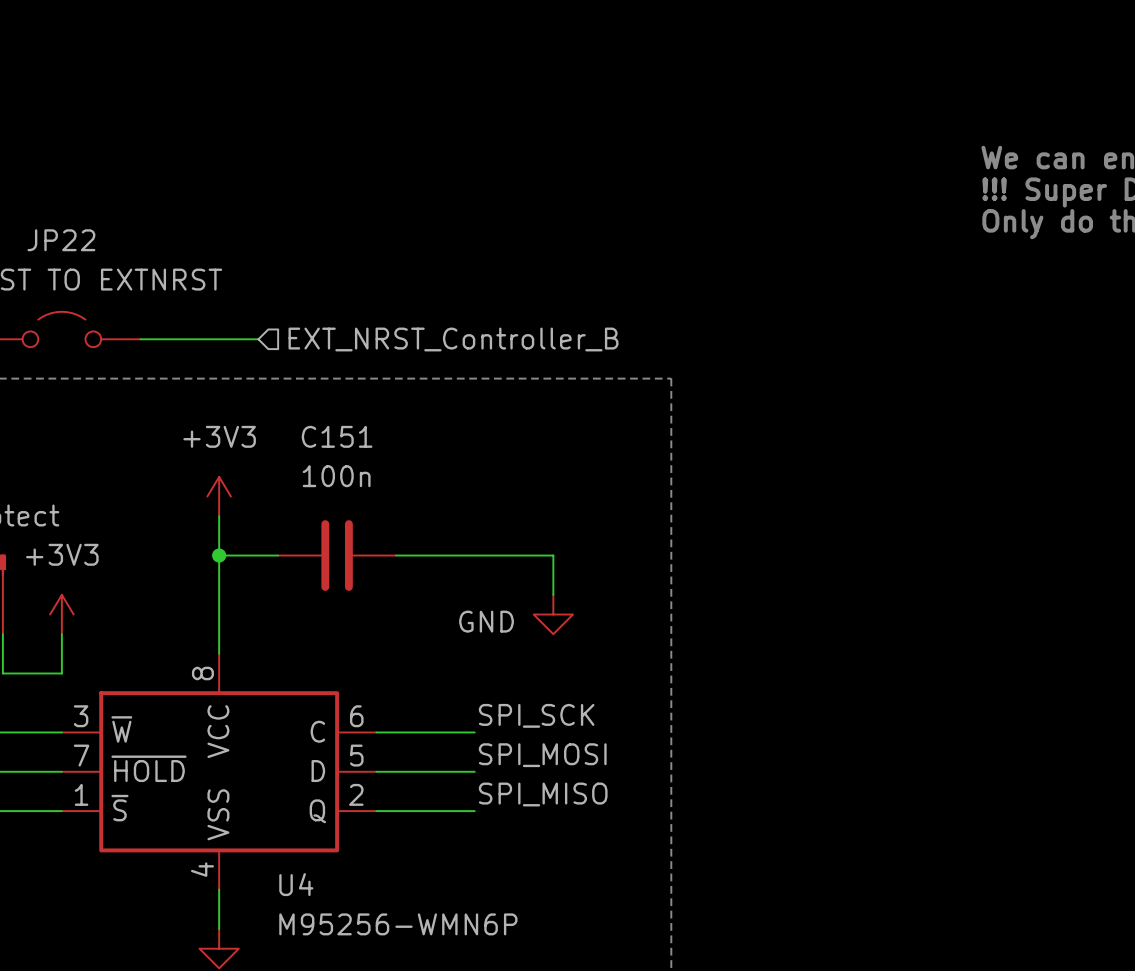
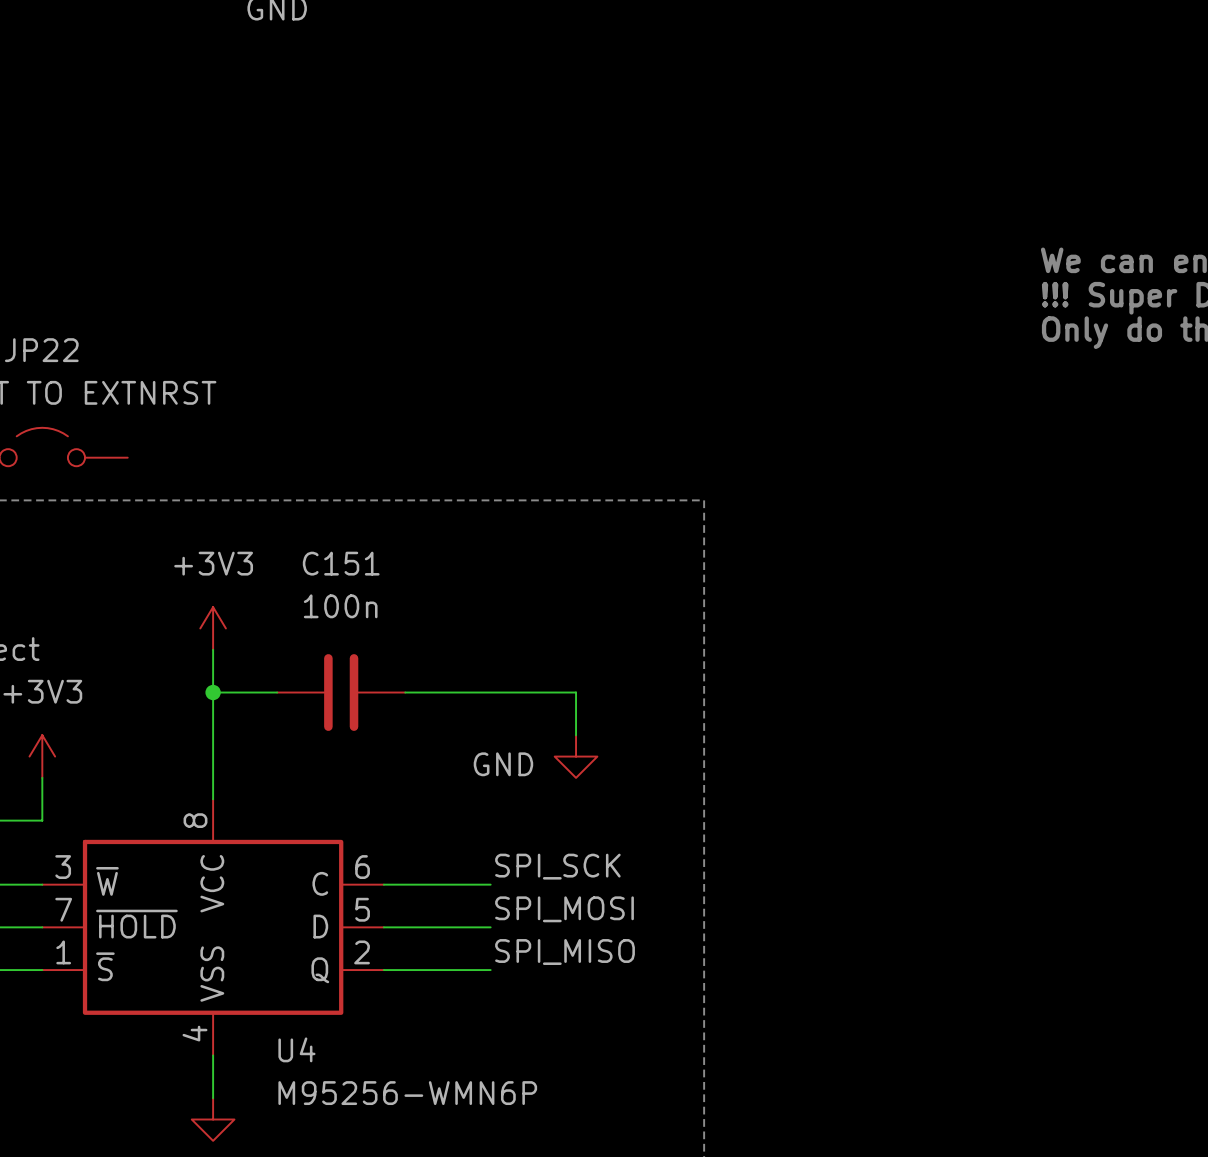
wire: (140, 339) (258, 339) -> none
hierarchical label: EXT_NRST_Controller_B (453, 339) -> none

